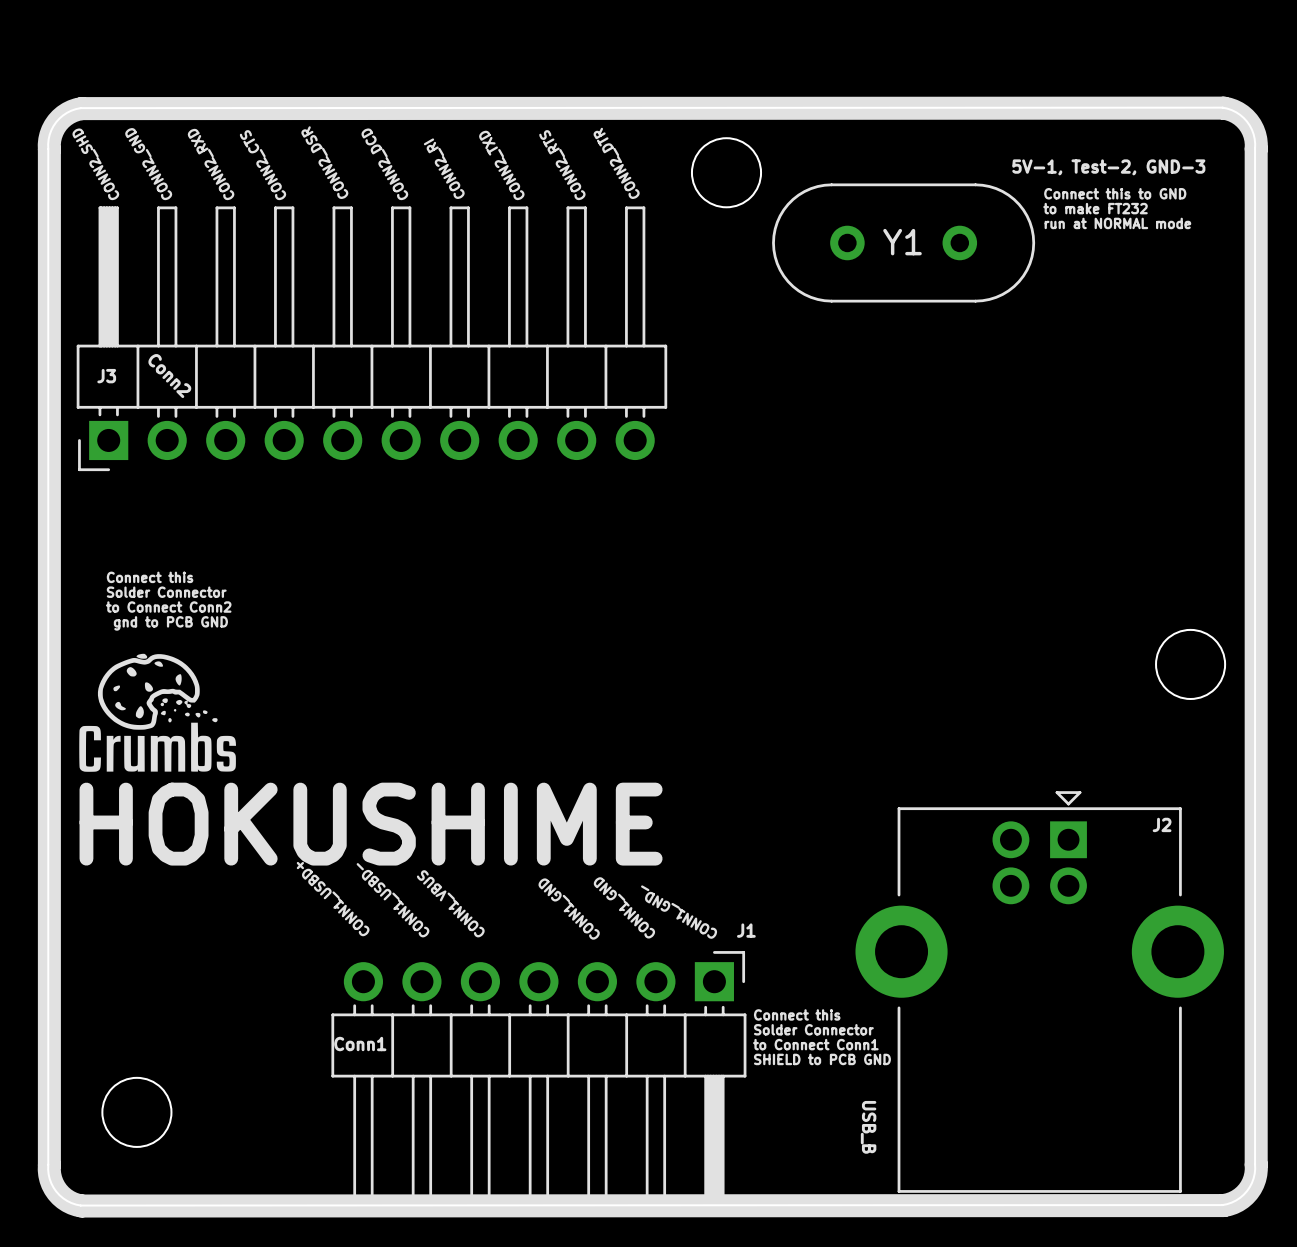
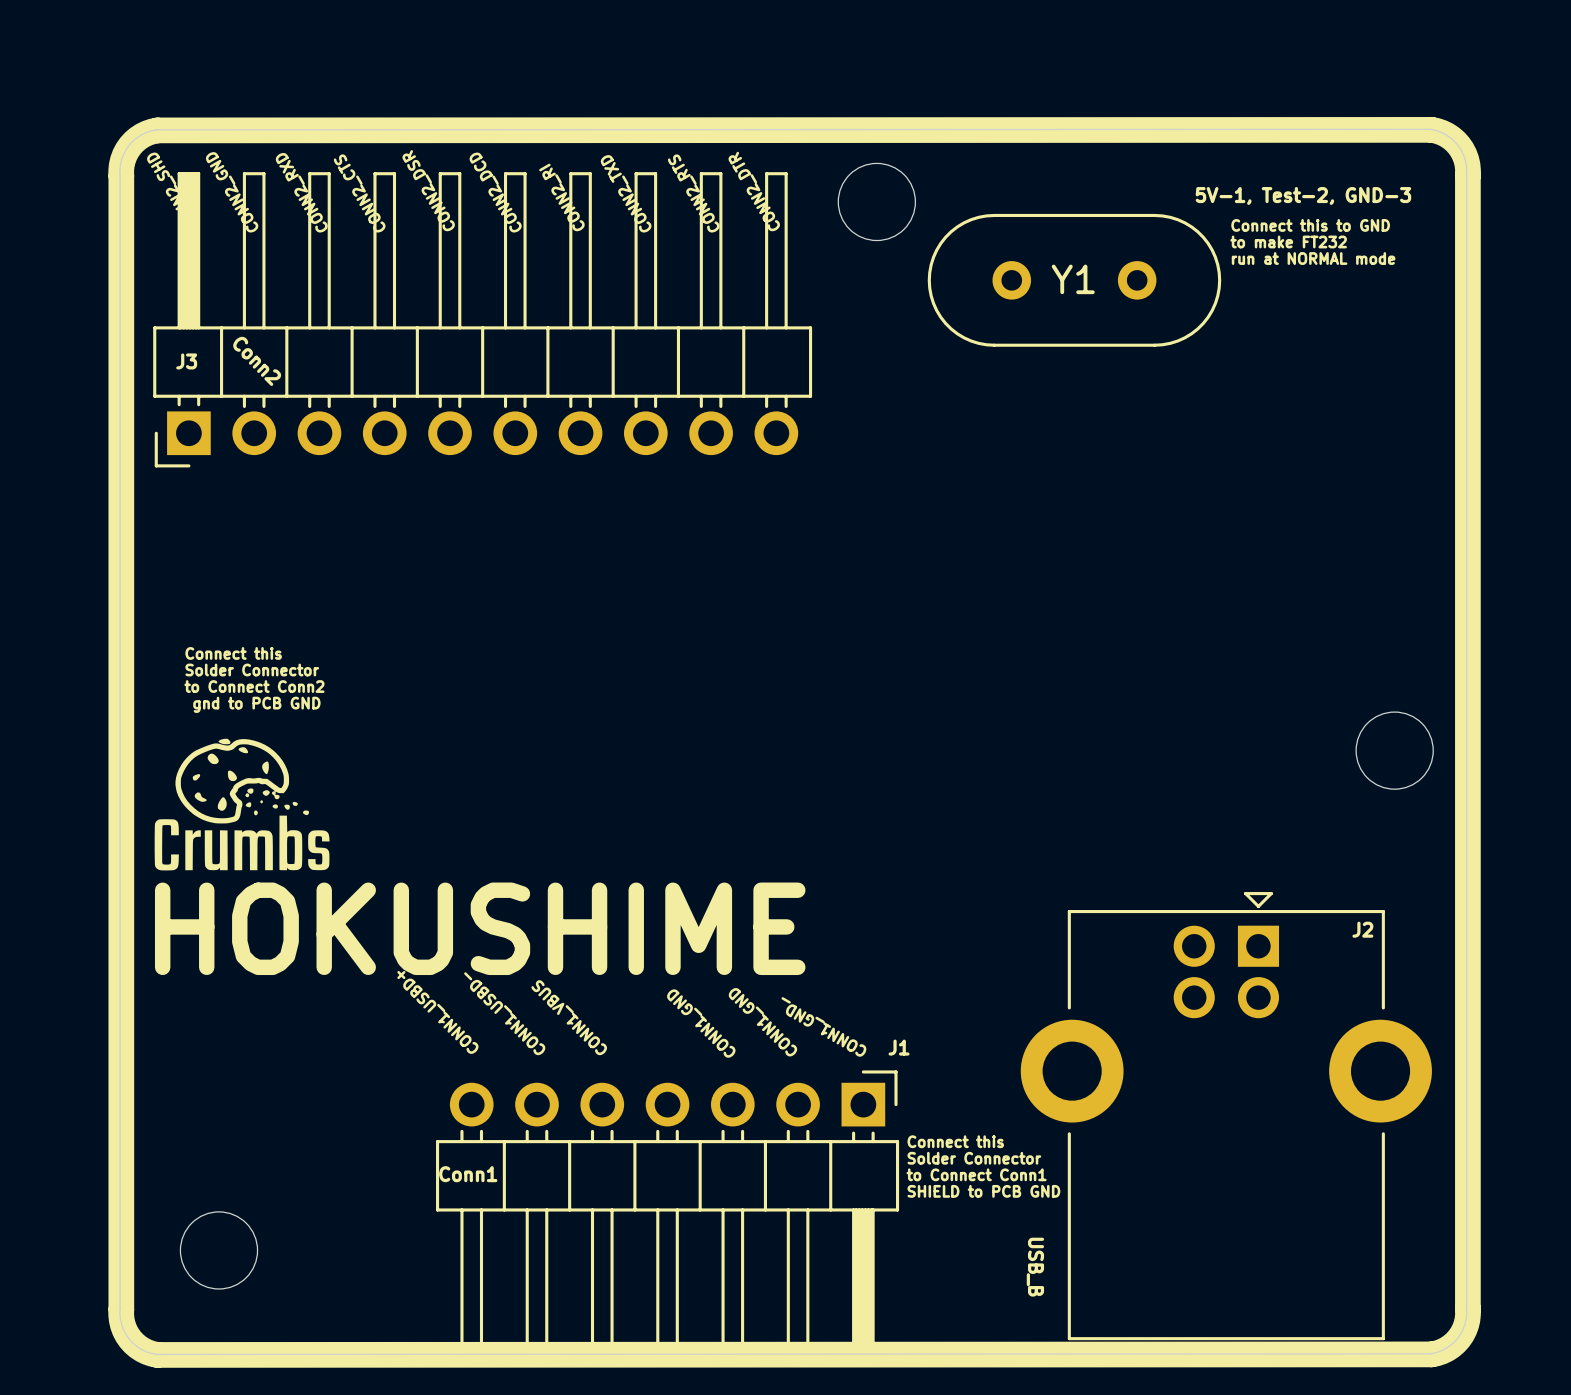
J3 position: (371, 338) -> (482, 319)

